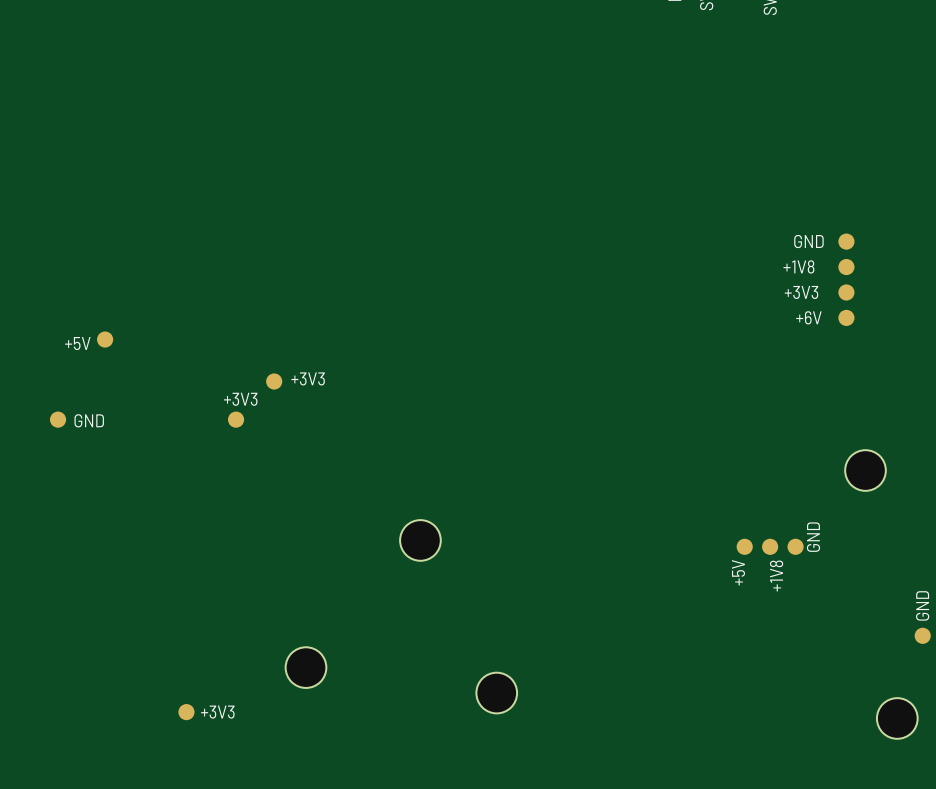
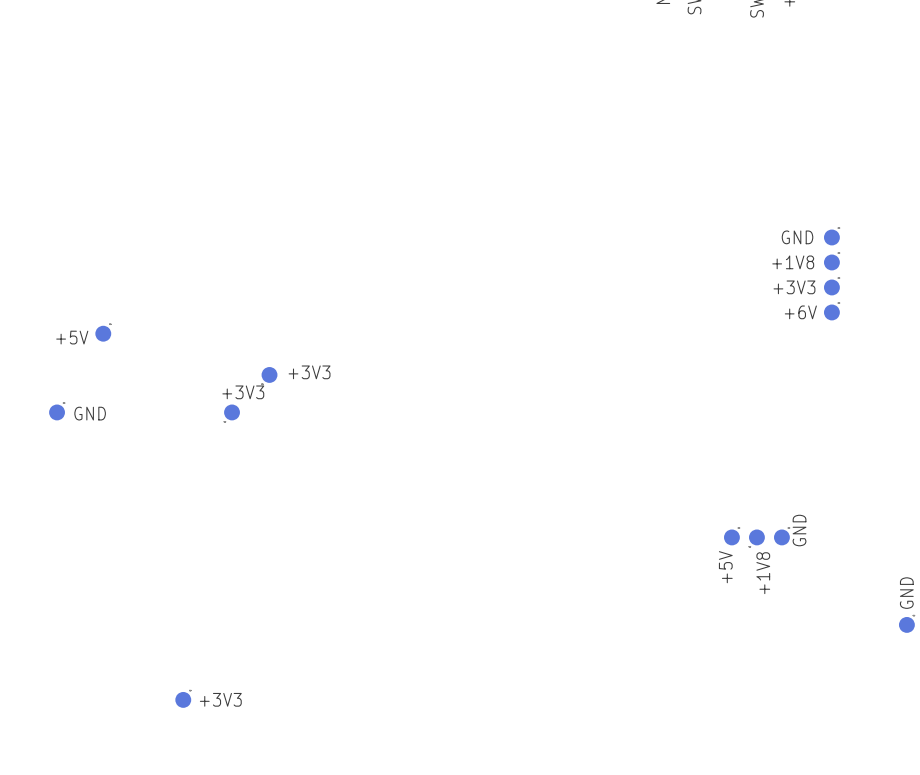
hole: (865, 470) -> none
hole: (420, 540) -> none
hole: (306, 667) -> none
hole: (496, 693) -> none
hole: (897, 718) -> none

